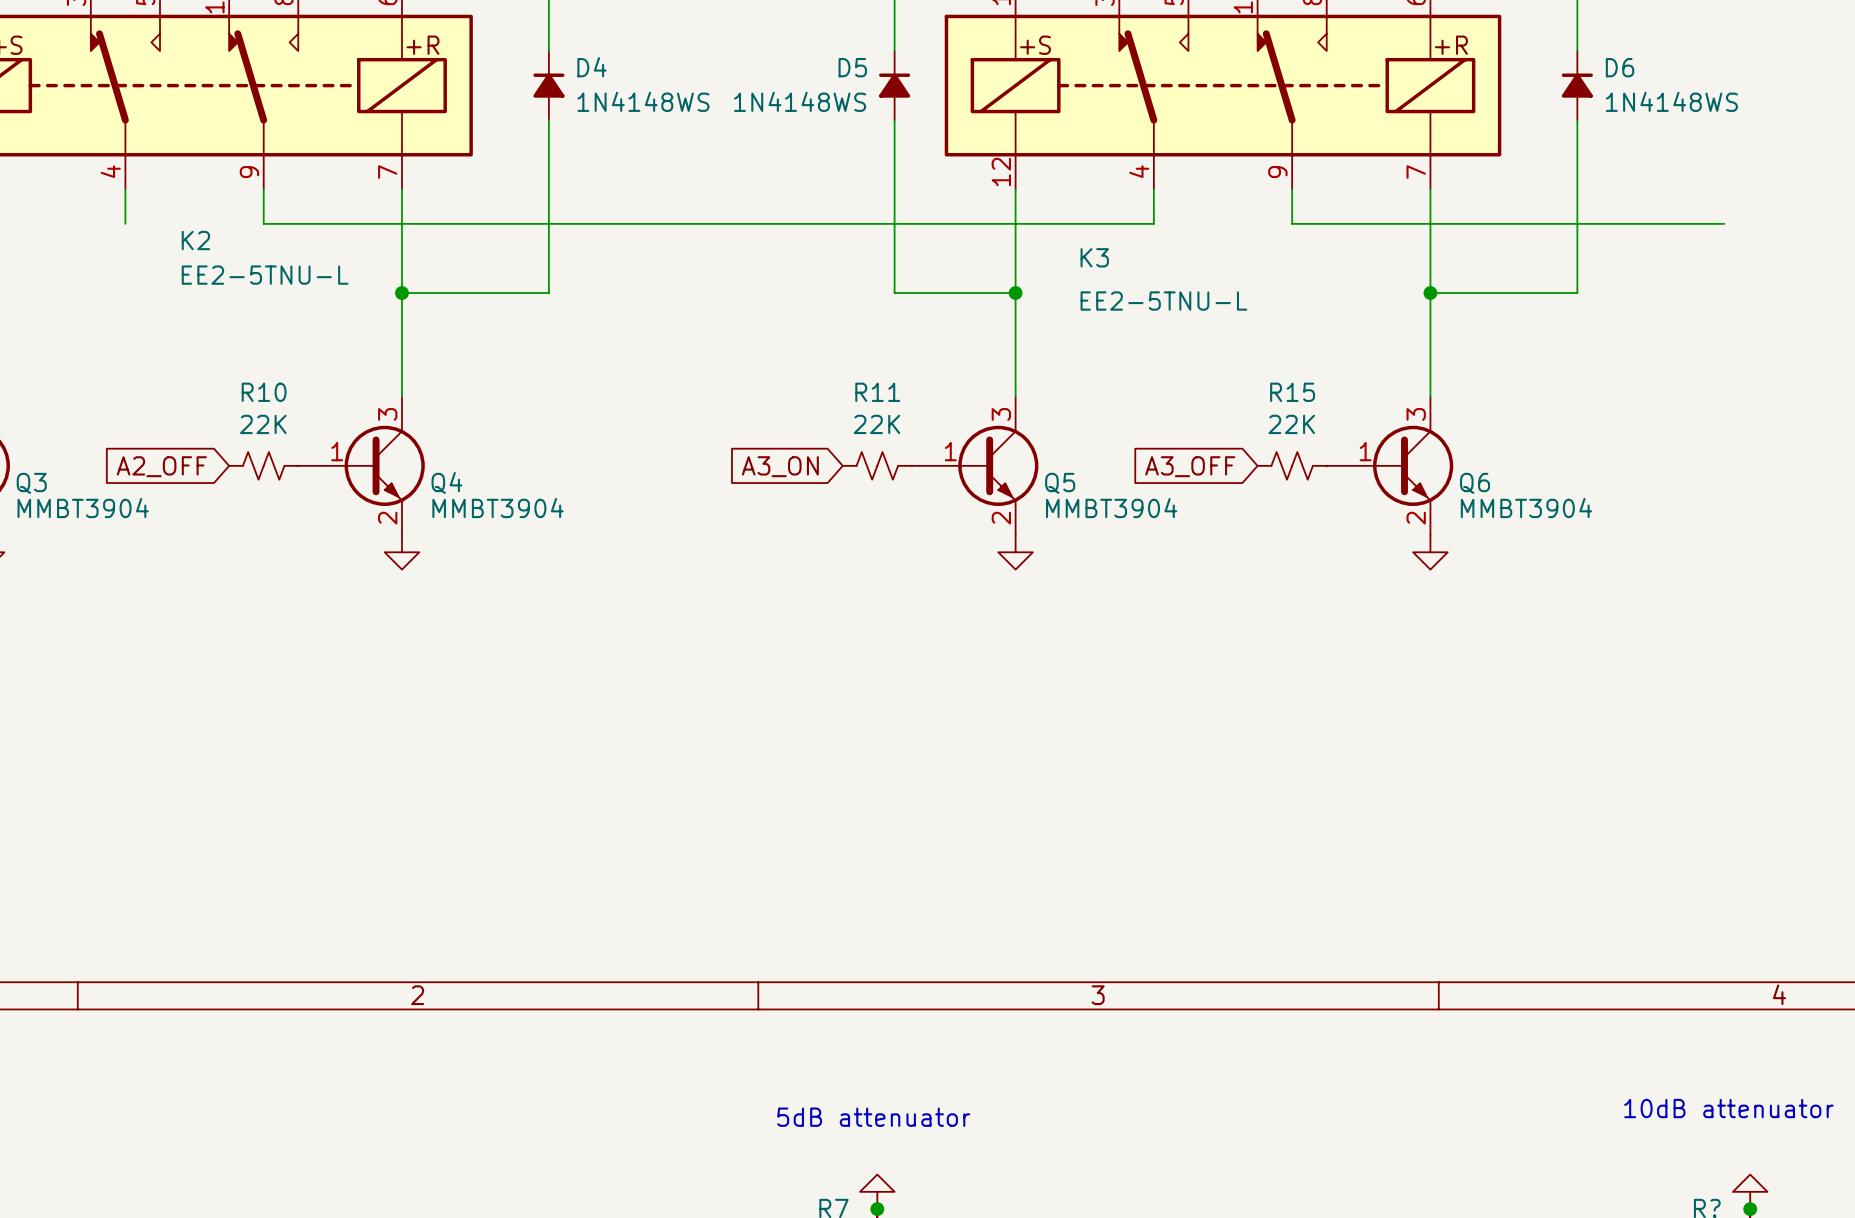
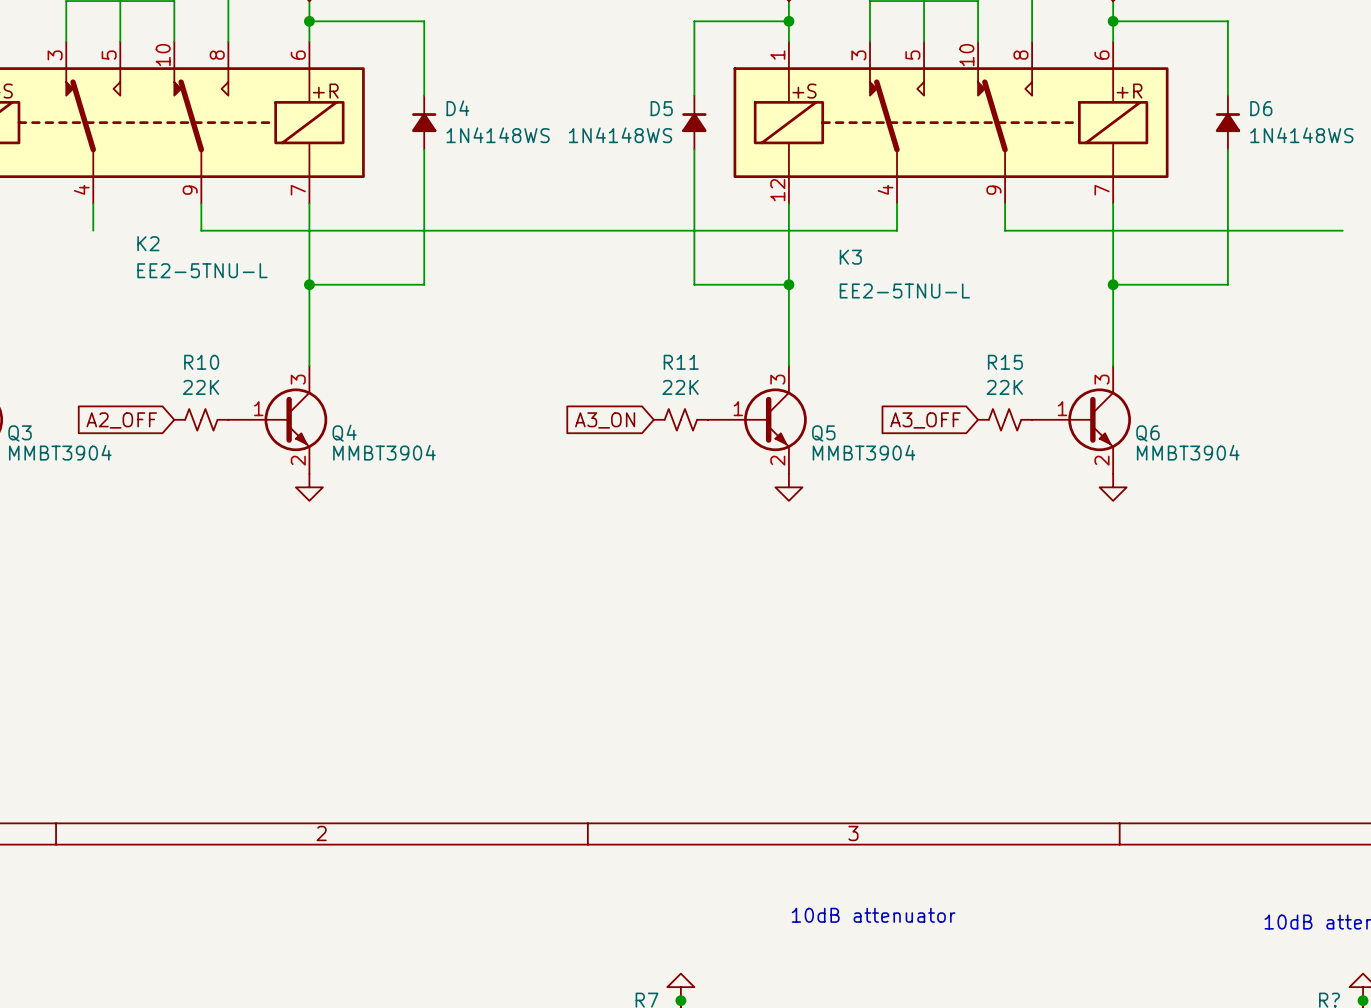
text: none -> 10dB attenuator (873, 915)
text: 5dB attenuator (873, 1117) -> none

